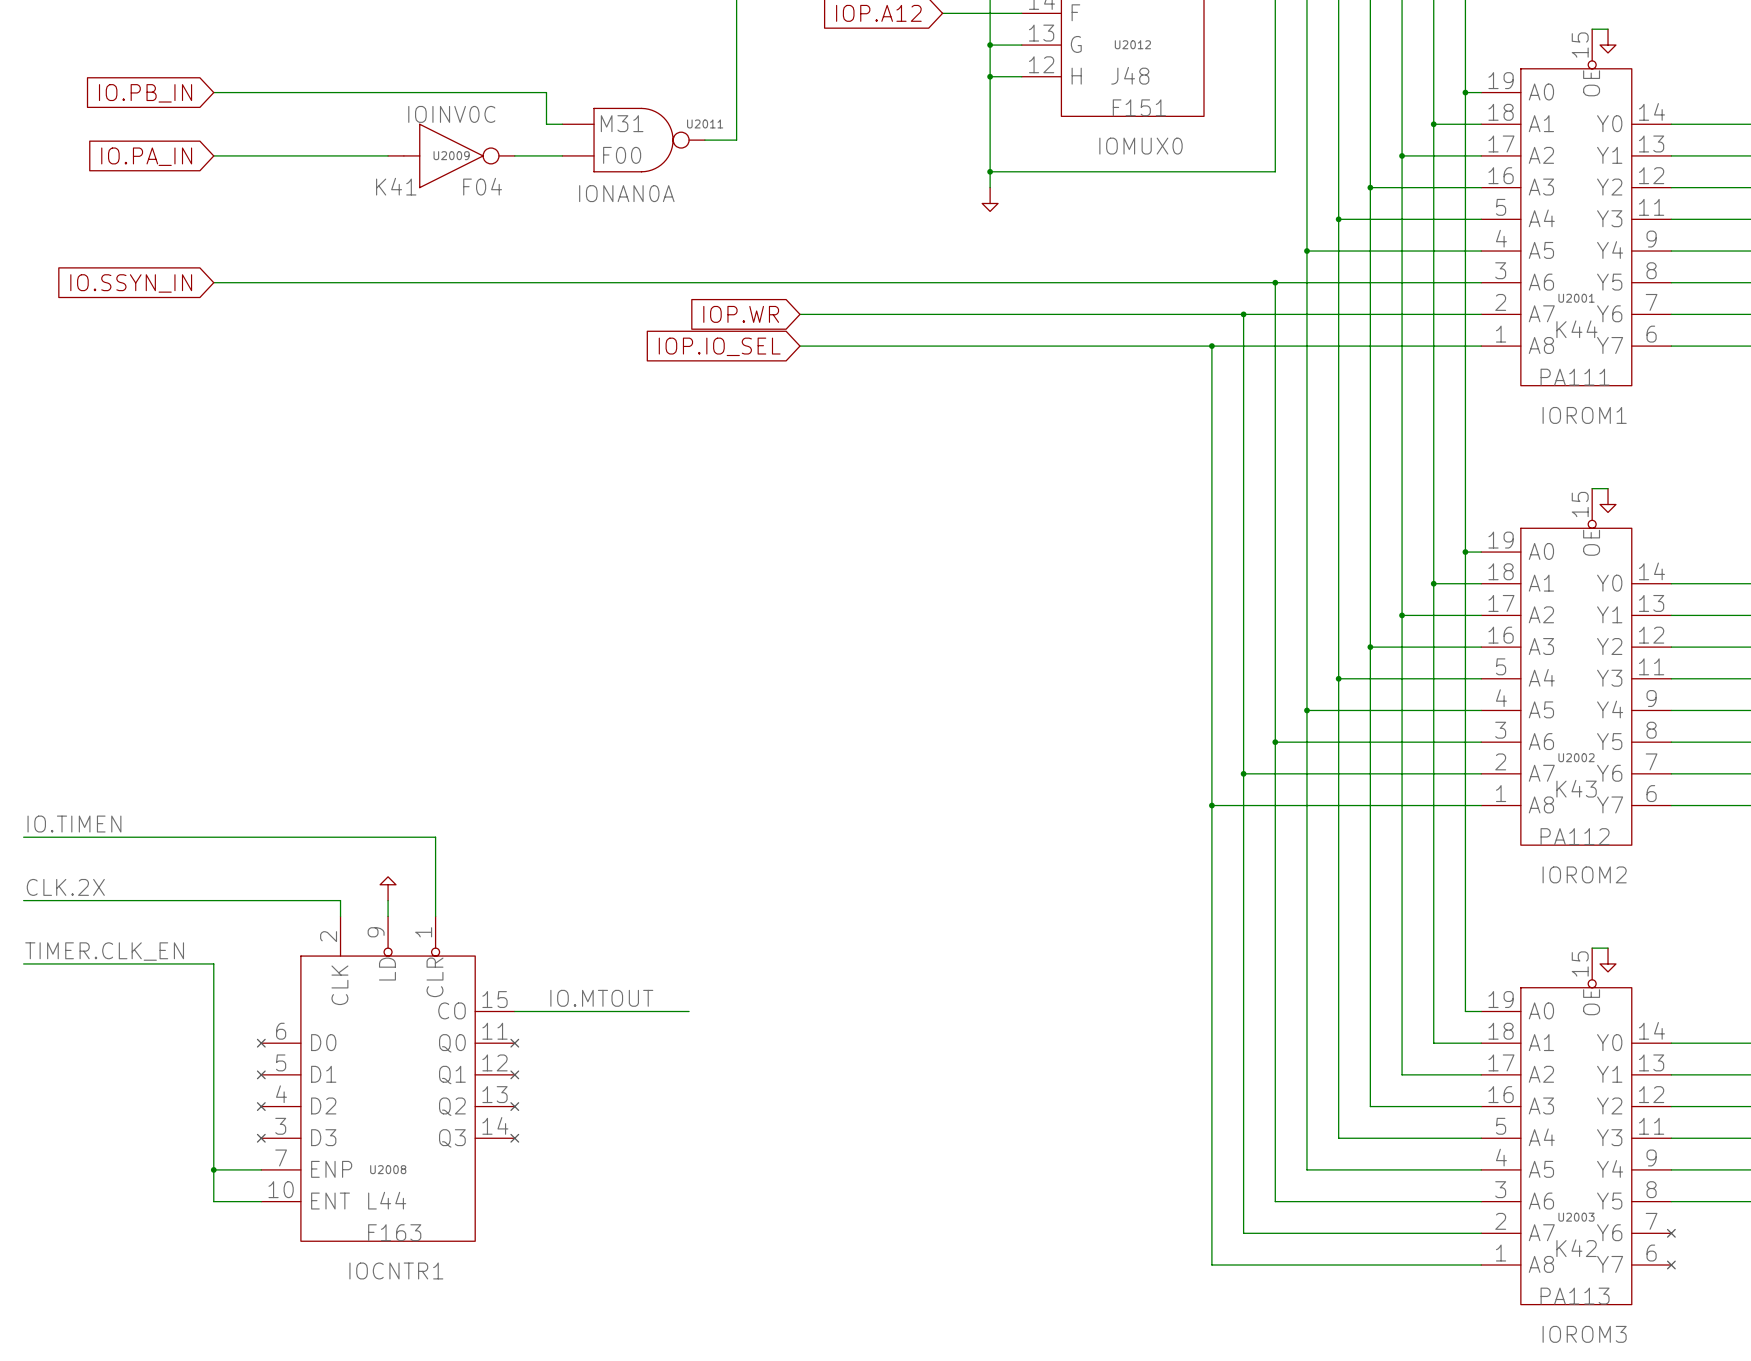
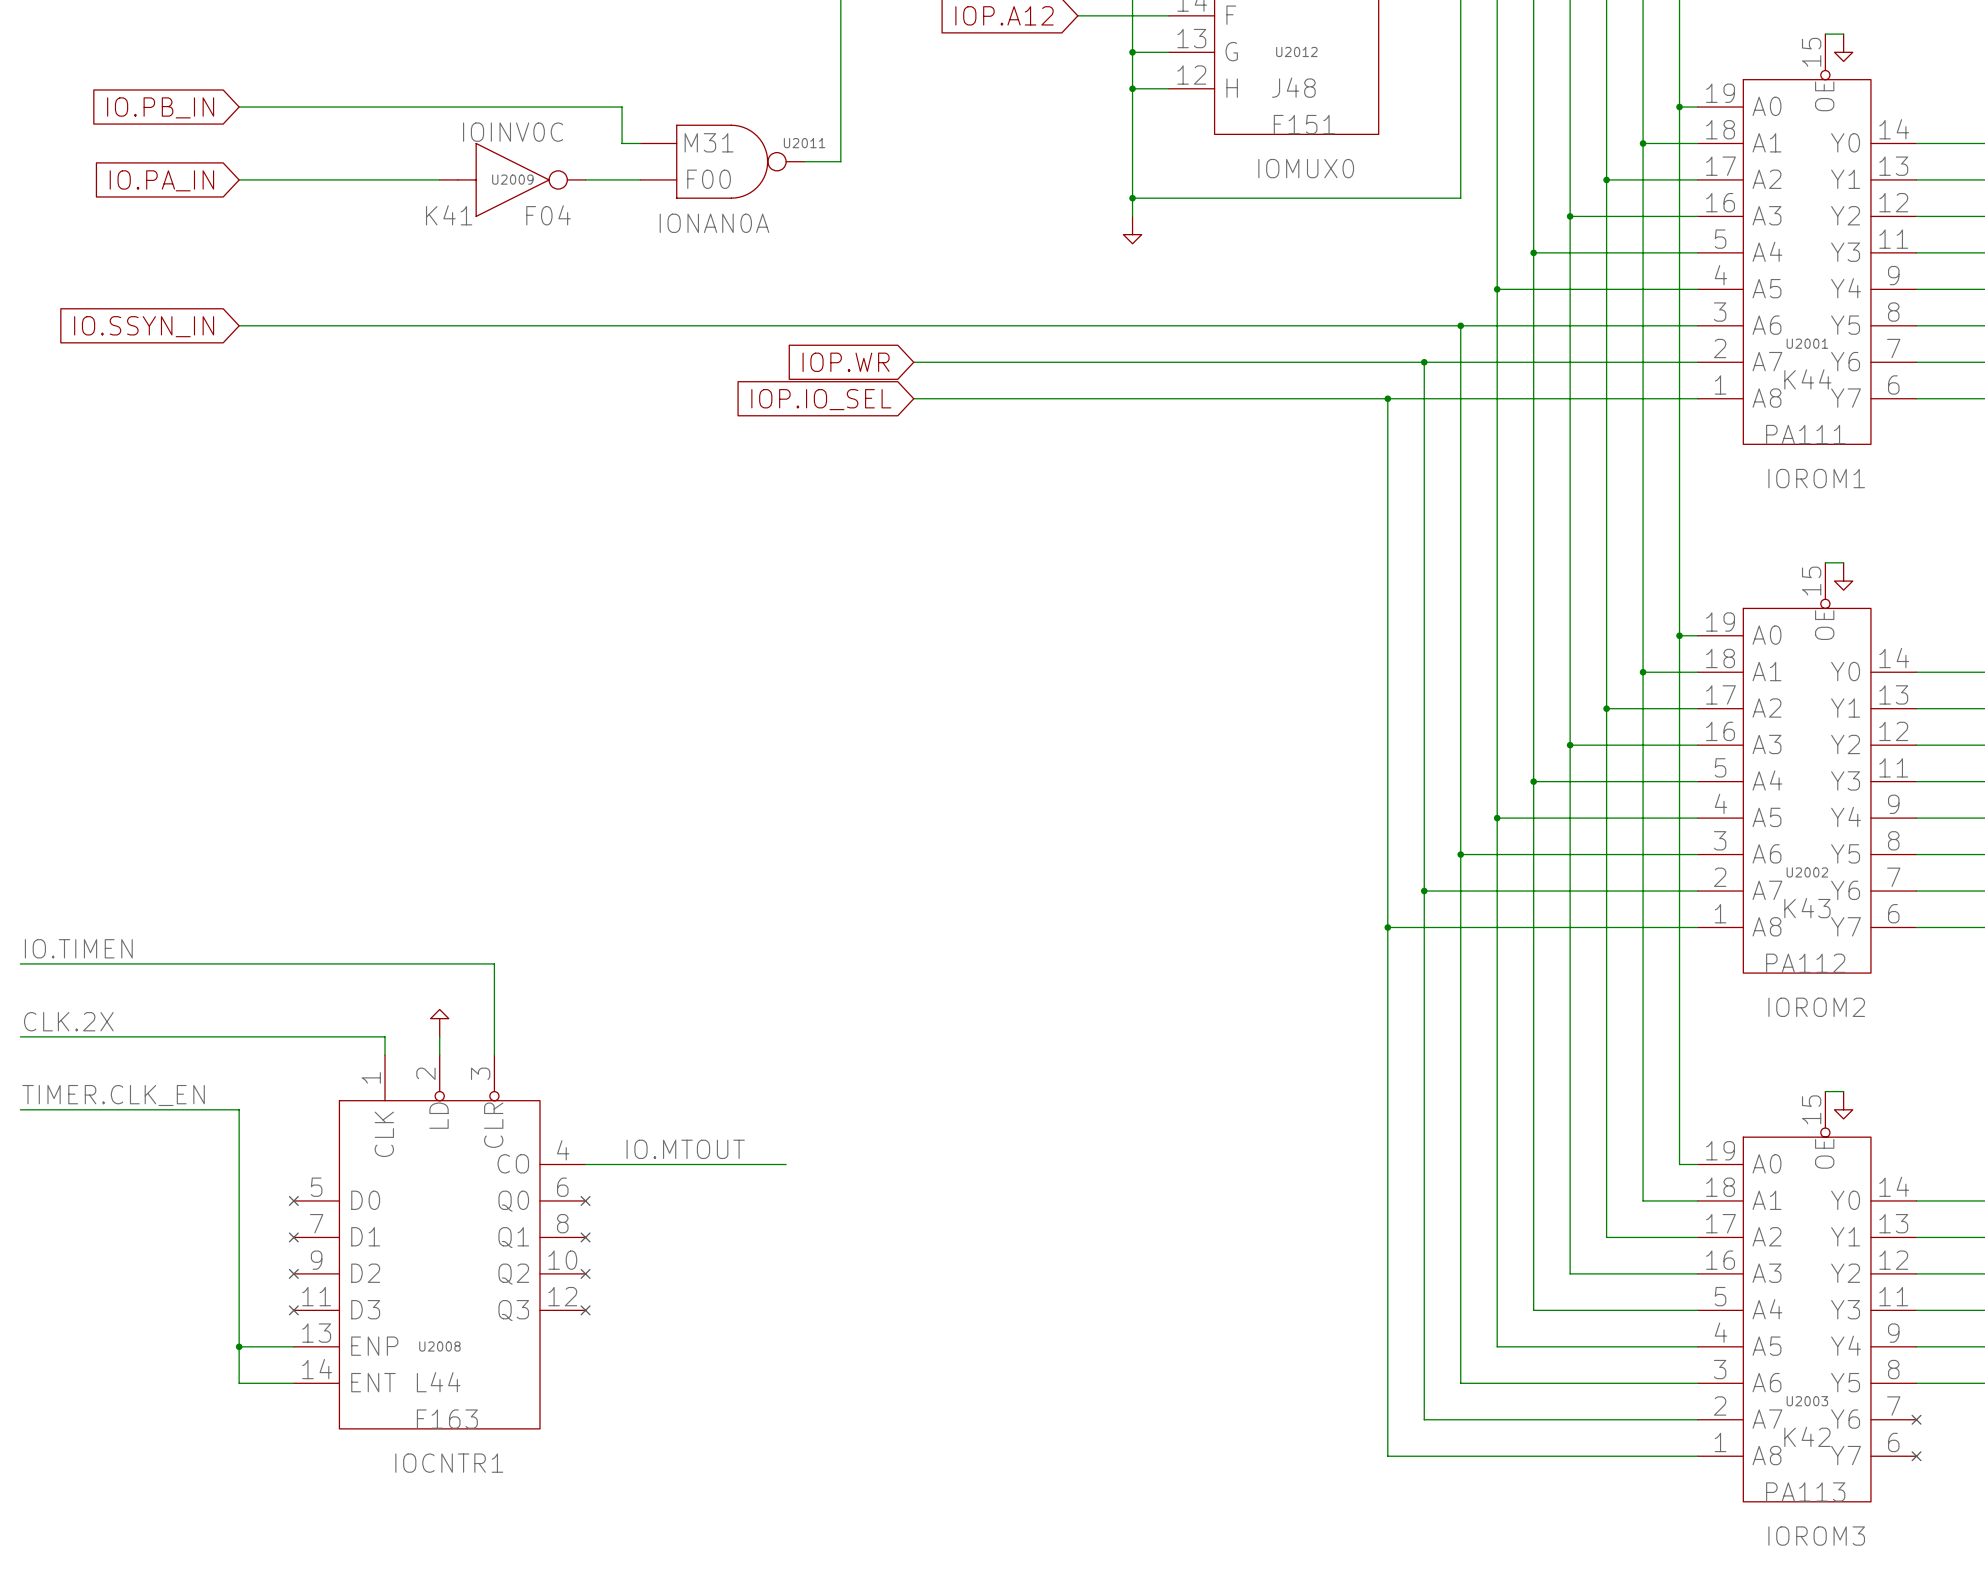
U2008 symbol: [261, 916, 515, 1242] -> [293, 1055, 586, 1429]

